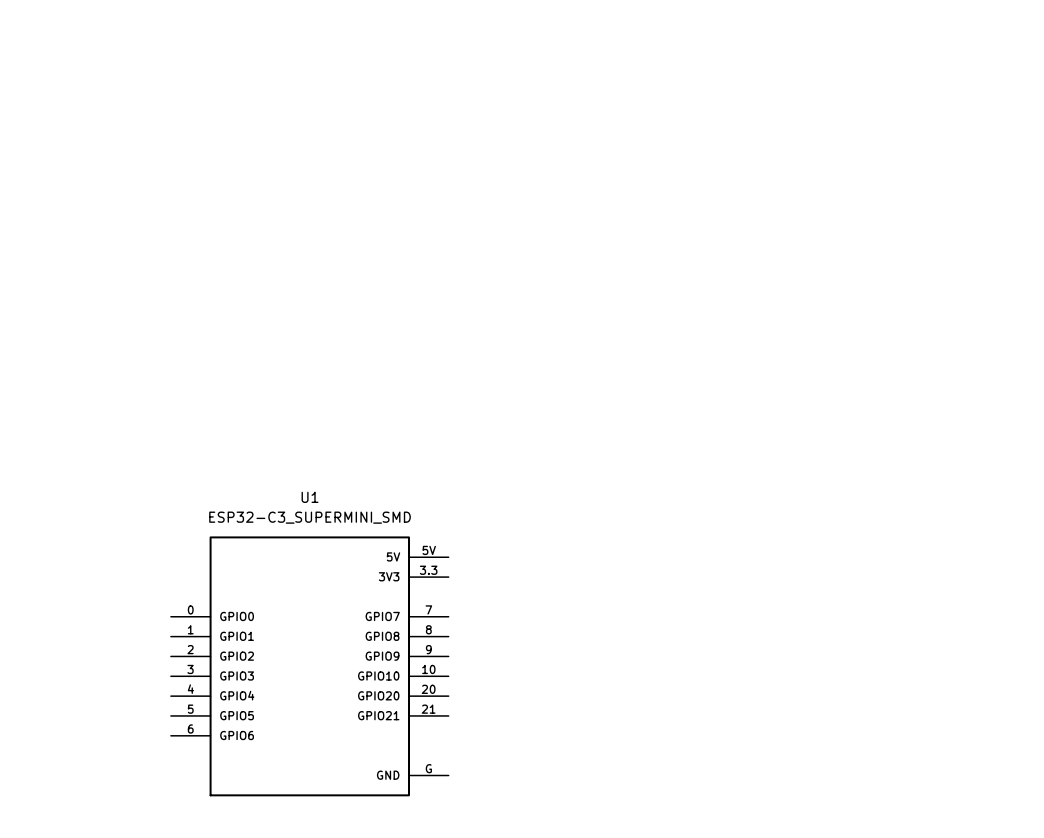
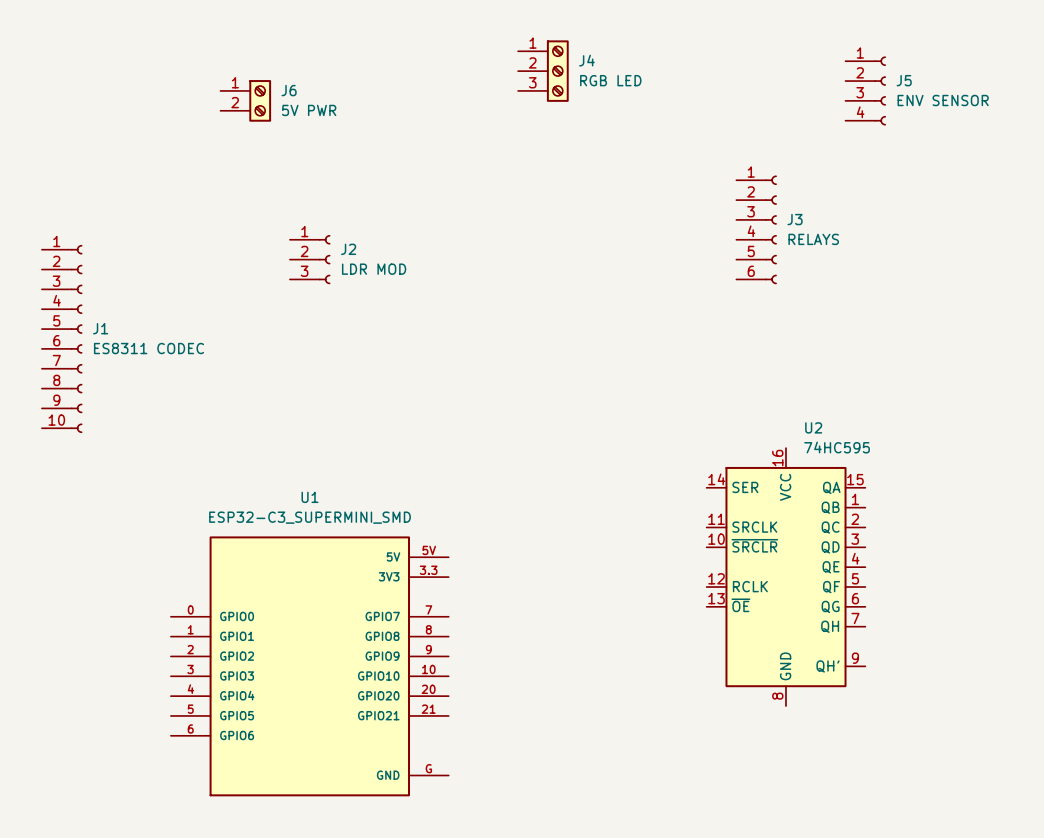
J4: none -> RGB LED (543, 71)
J5: none -> ENV SENSOR (865, 90)
J6: none -> 5V PWR (245, 100)
J3: none -> RELAYS (756, 229)
J2: none -> LDR MOD (310, 259)
J1: none -> ES8311 CODEC (62, 338)
U2: none -> 74HC595 (785, 577)

